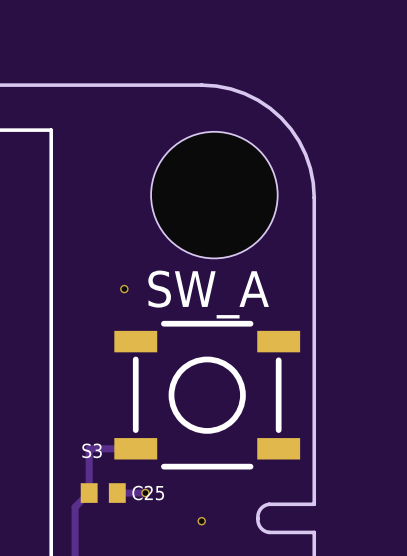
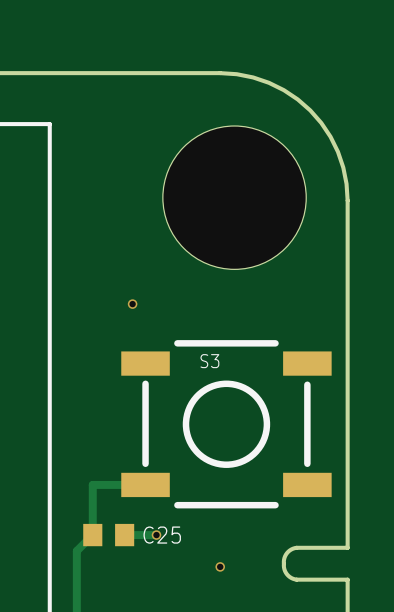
text: SW_A (208, 294) -> none
S3 name position: S3 (92, 450) -> S3 (209, 361)

